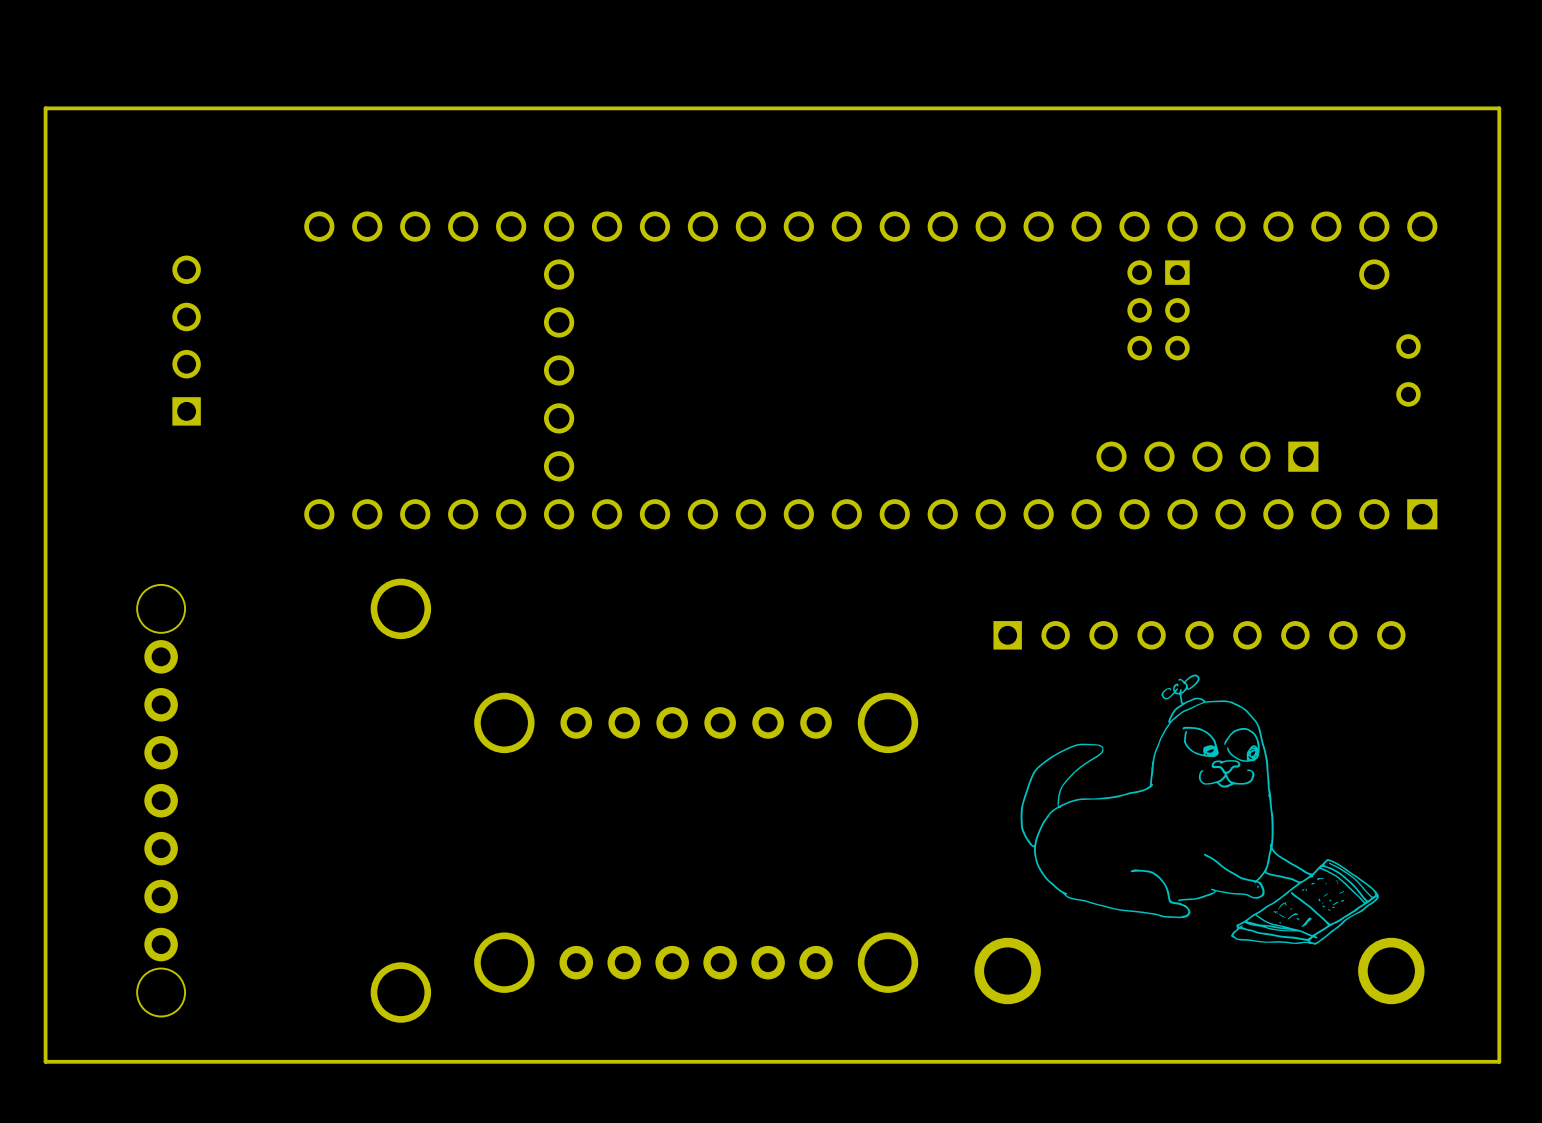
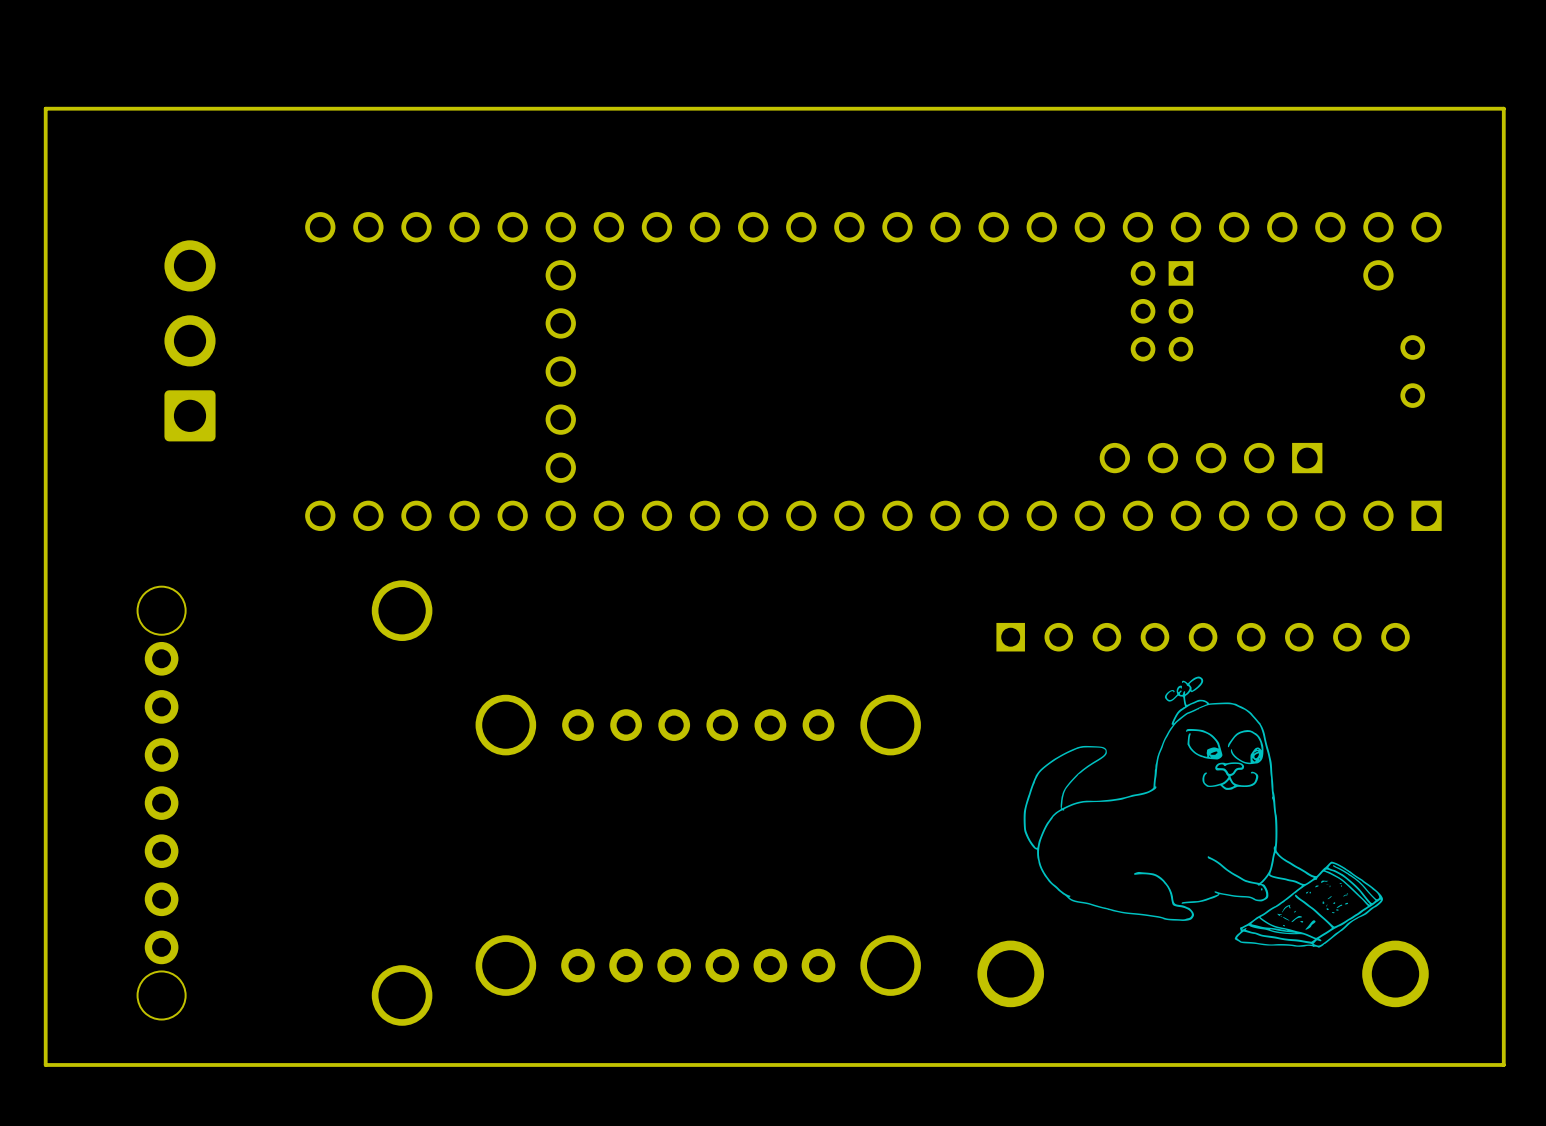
part footprint: [172, 255, 201, 426] -> [164, 240, 216, 442]

